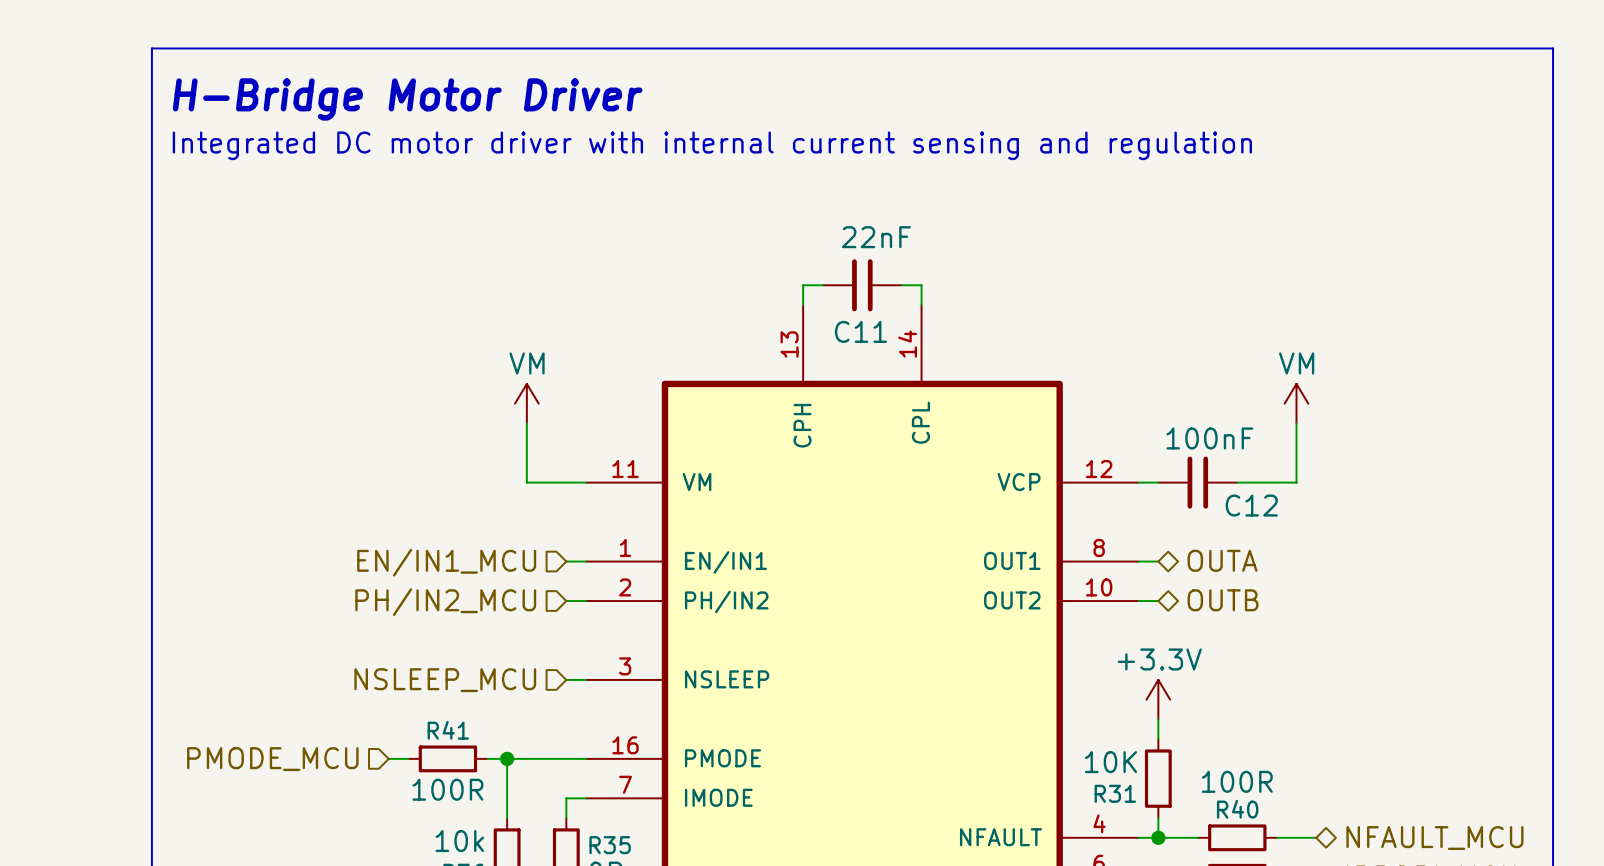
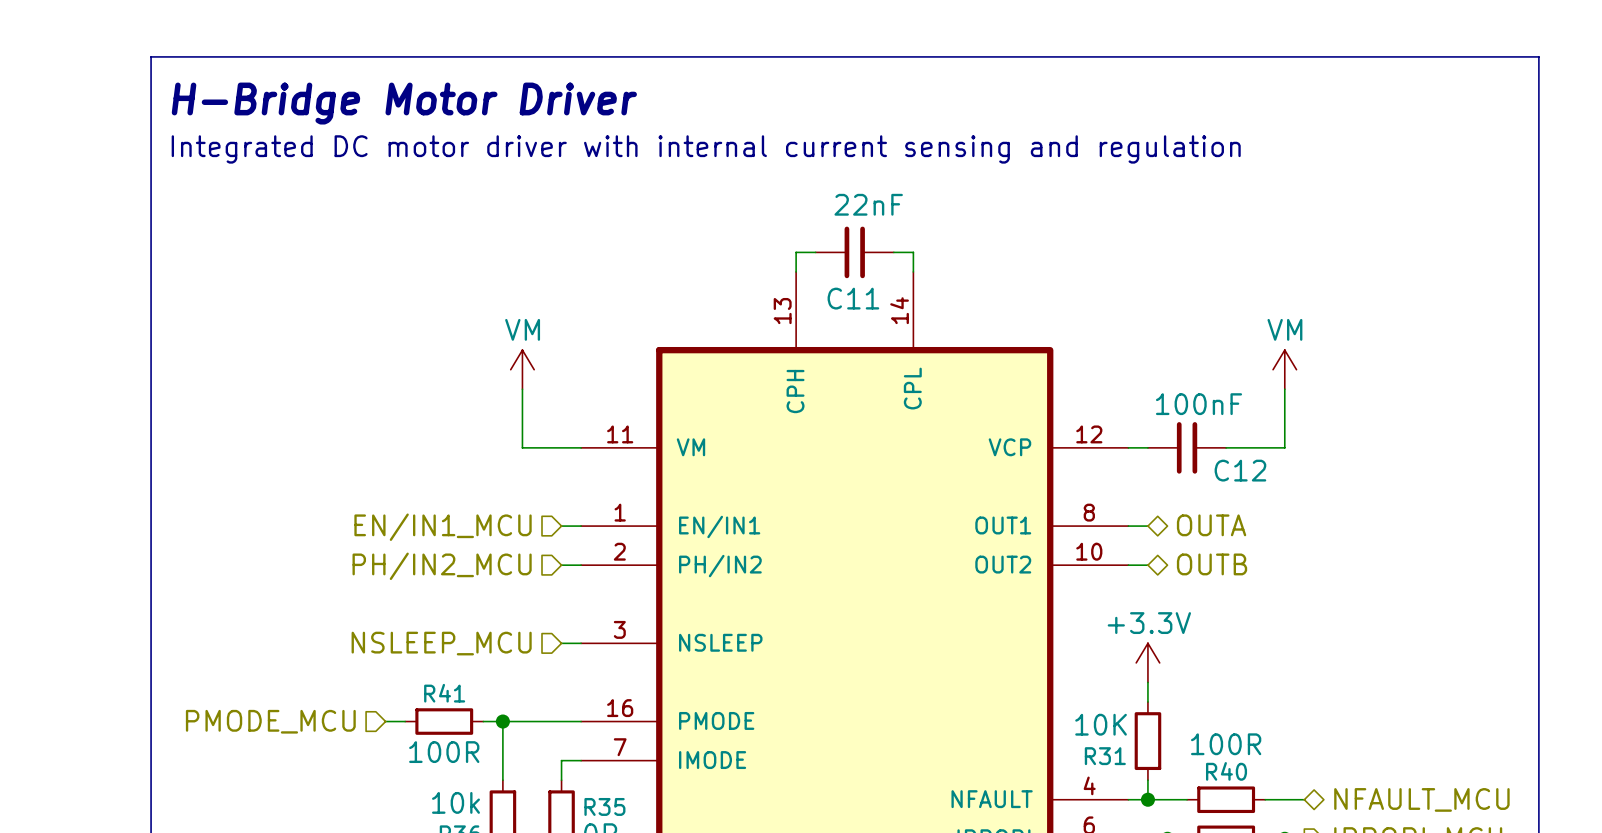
line: (151, 87) (151, 48) (1553, 48) (1553, 87) -> (151, 56) (1538, 56)
text position: H-Bridge Motor Driver (407, 99) -> H-Bridge Motor Driver (404, 103)
text position: Integrated DC motor driver with internal current sensing and regulation (712, 145) -> Integrated DC motor driver with internal current sensing and regulation (706, 149)

